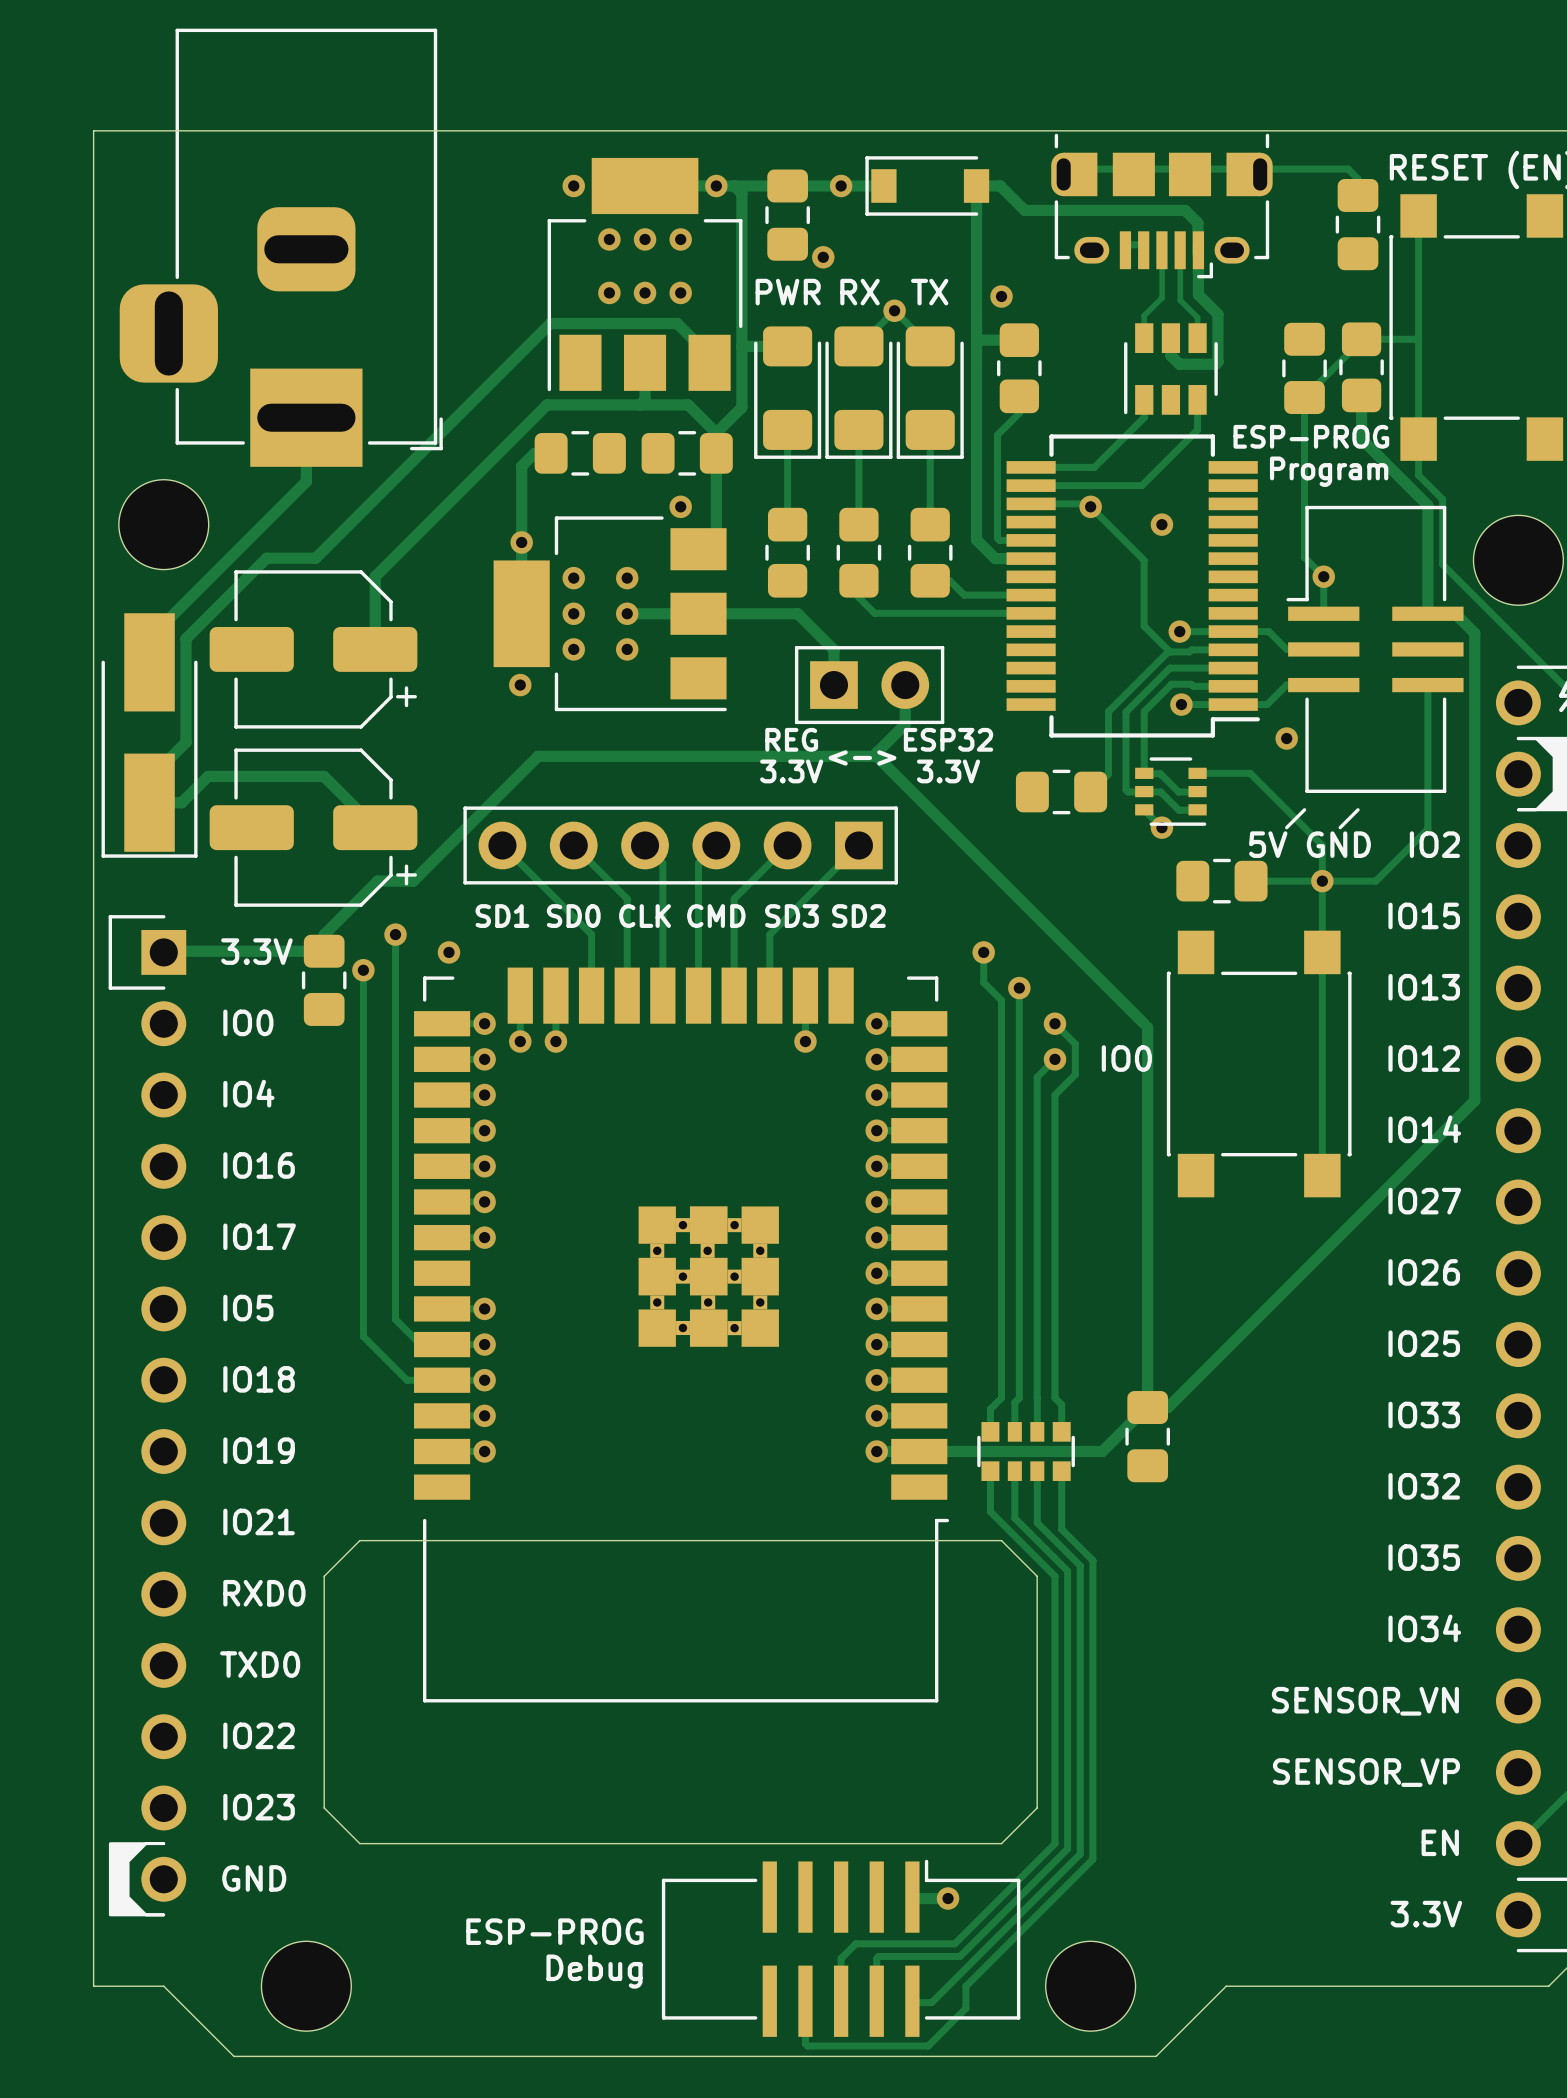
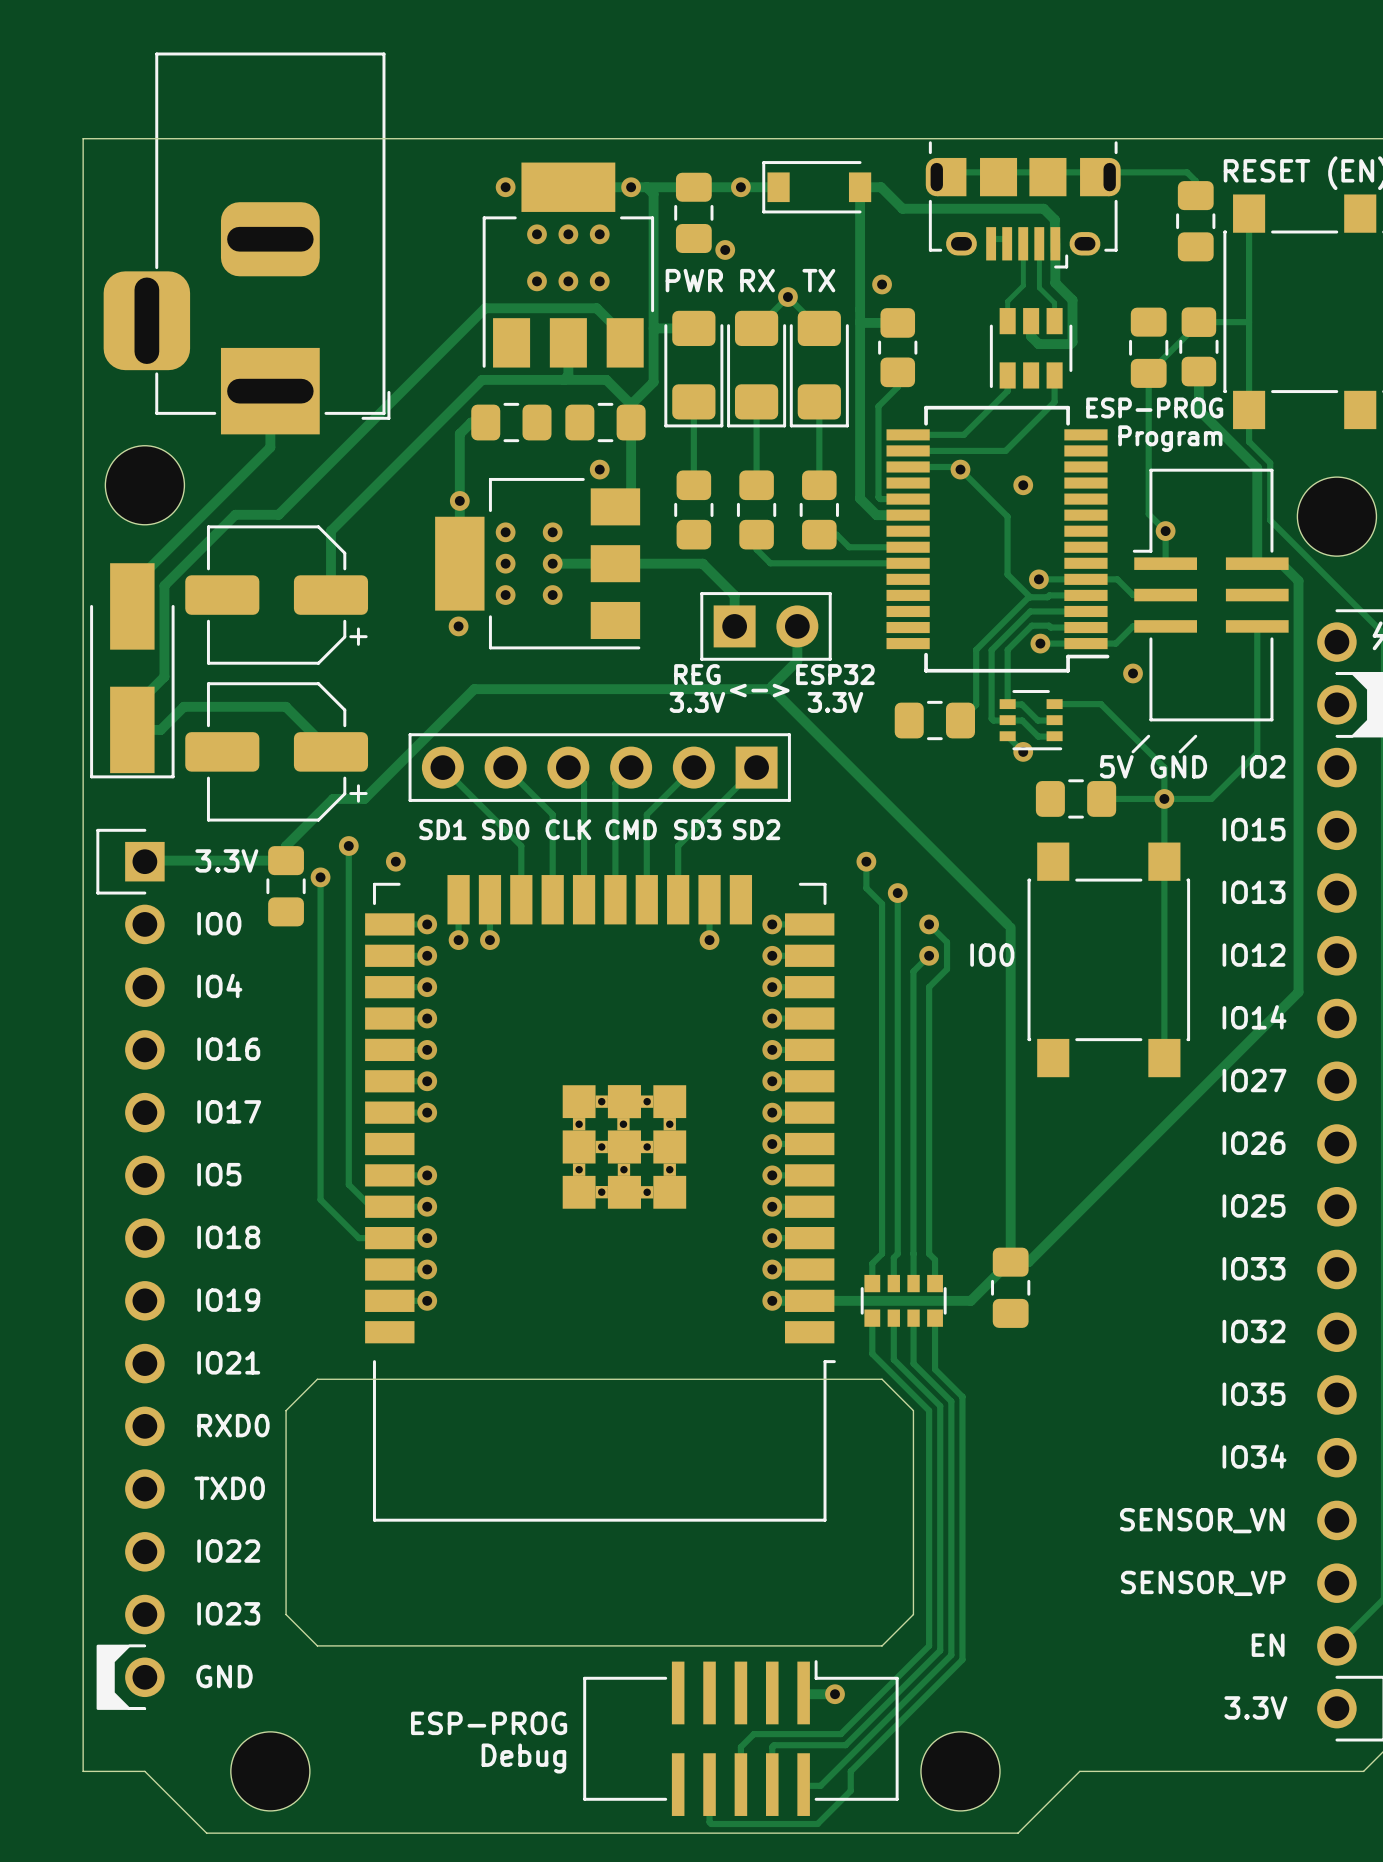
part footprint: [119, 28, 443, 467] -> [103, 52, 391, 435]

